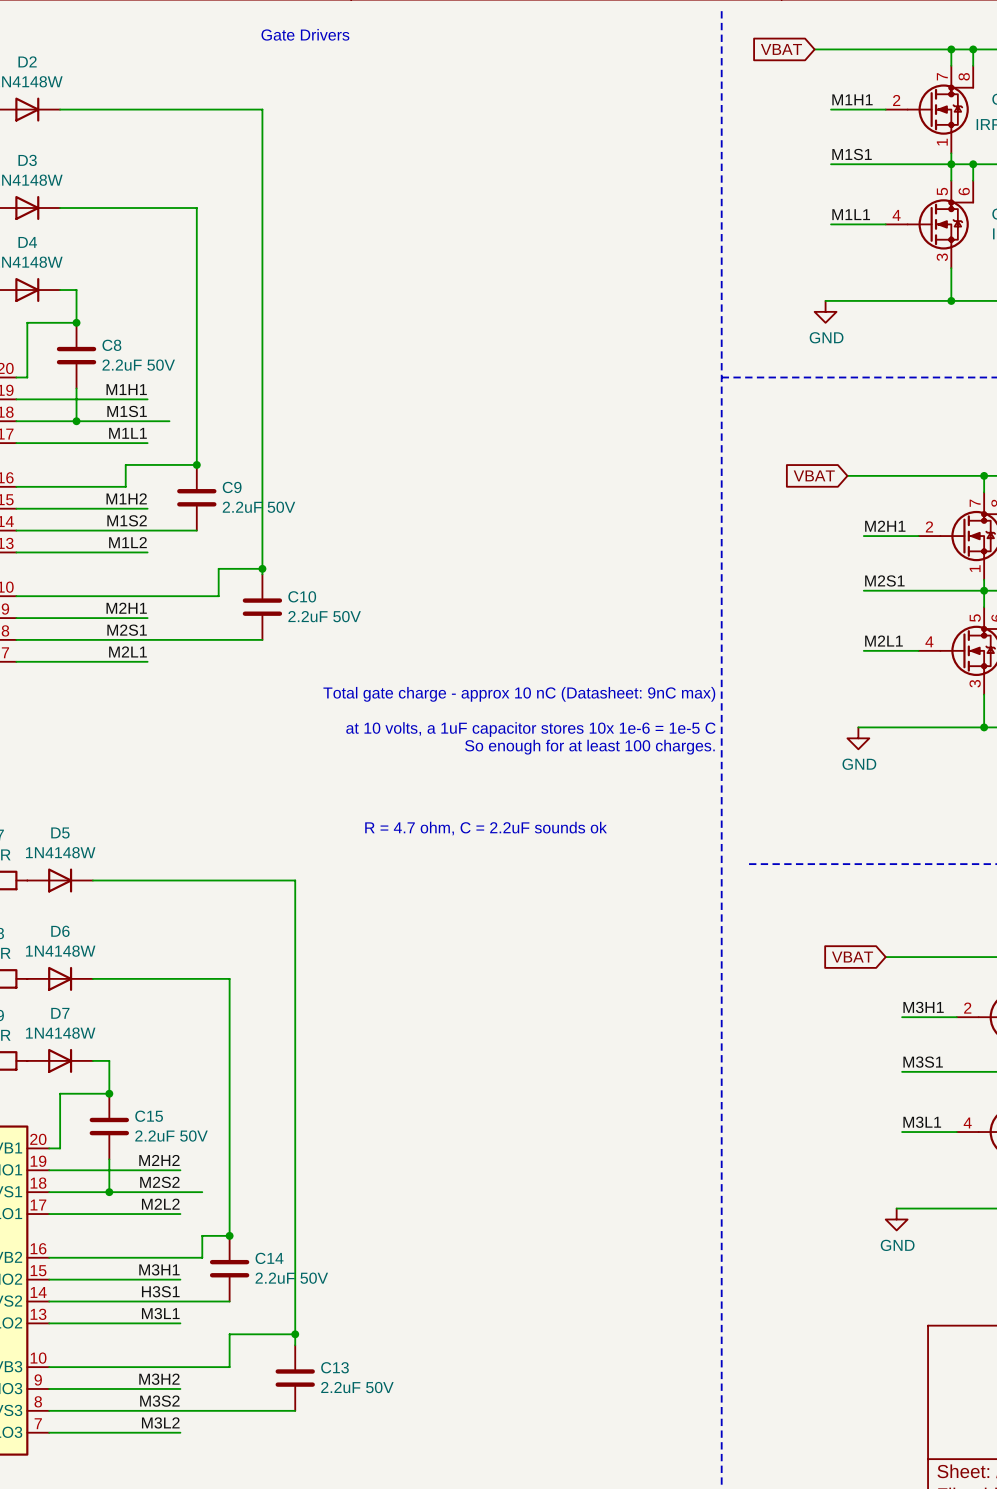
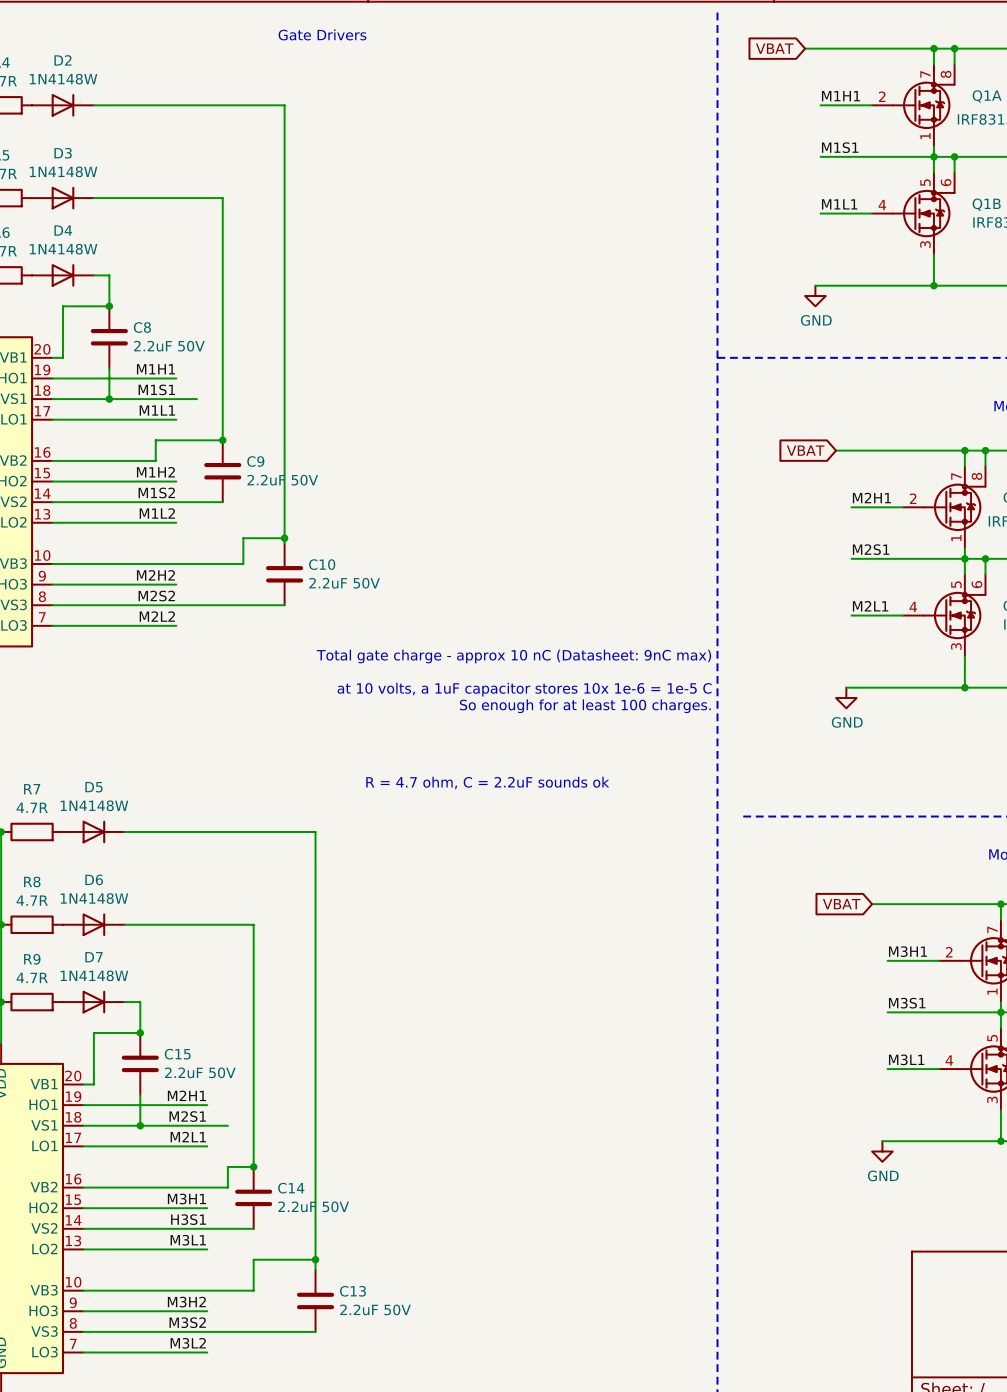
label: M2H1 (126, 608) -> M2H2 (155, 575)
label: M2S1 (127, 630) -> M2S2 (156, 596)
label: M2L1 (127, 651) -> M2L2 (157, 616)
label: M2H2 (159, 1160) -> M2H1 (186, 1095)
label: M2S2 (159, 1182) -> M2S1 (187, 1116)
label: M2L2 (160, 1204) -> M2L1 (188, 1137)

